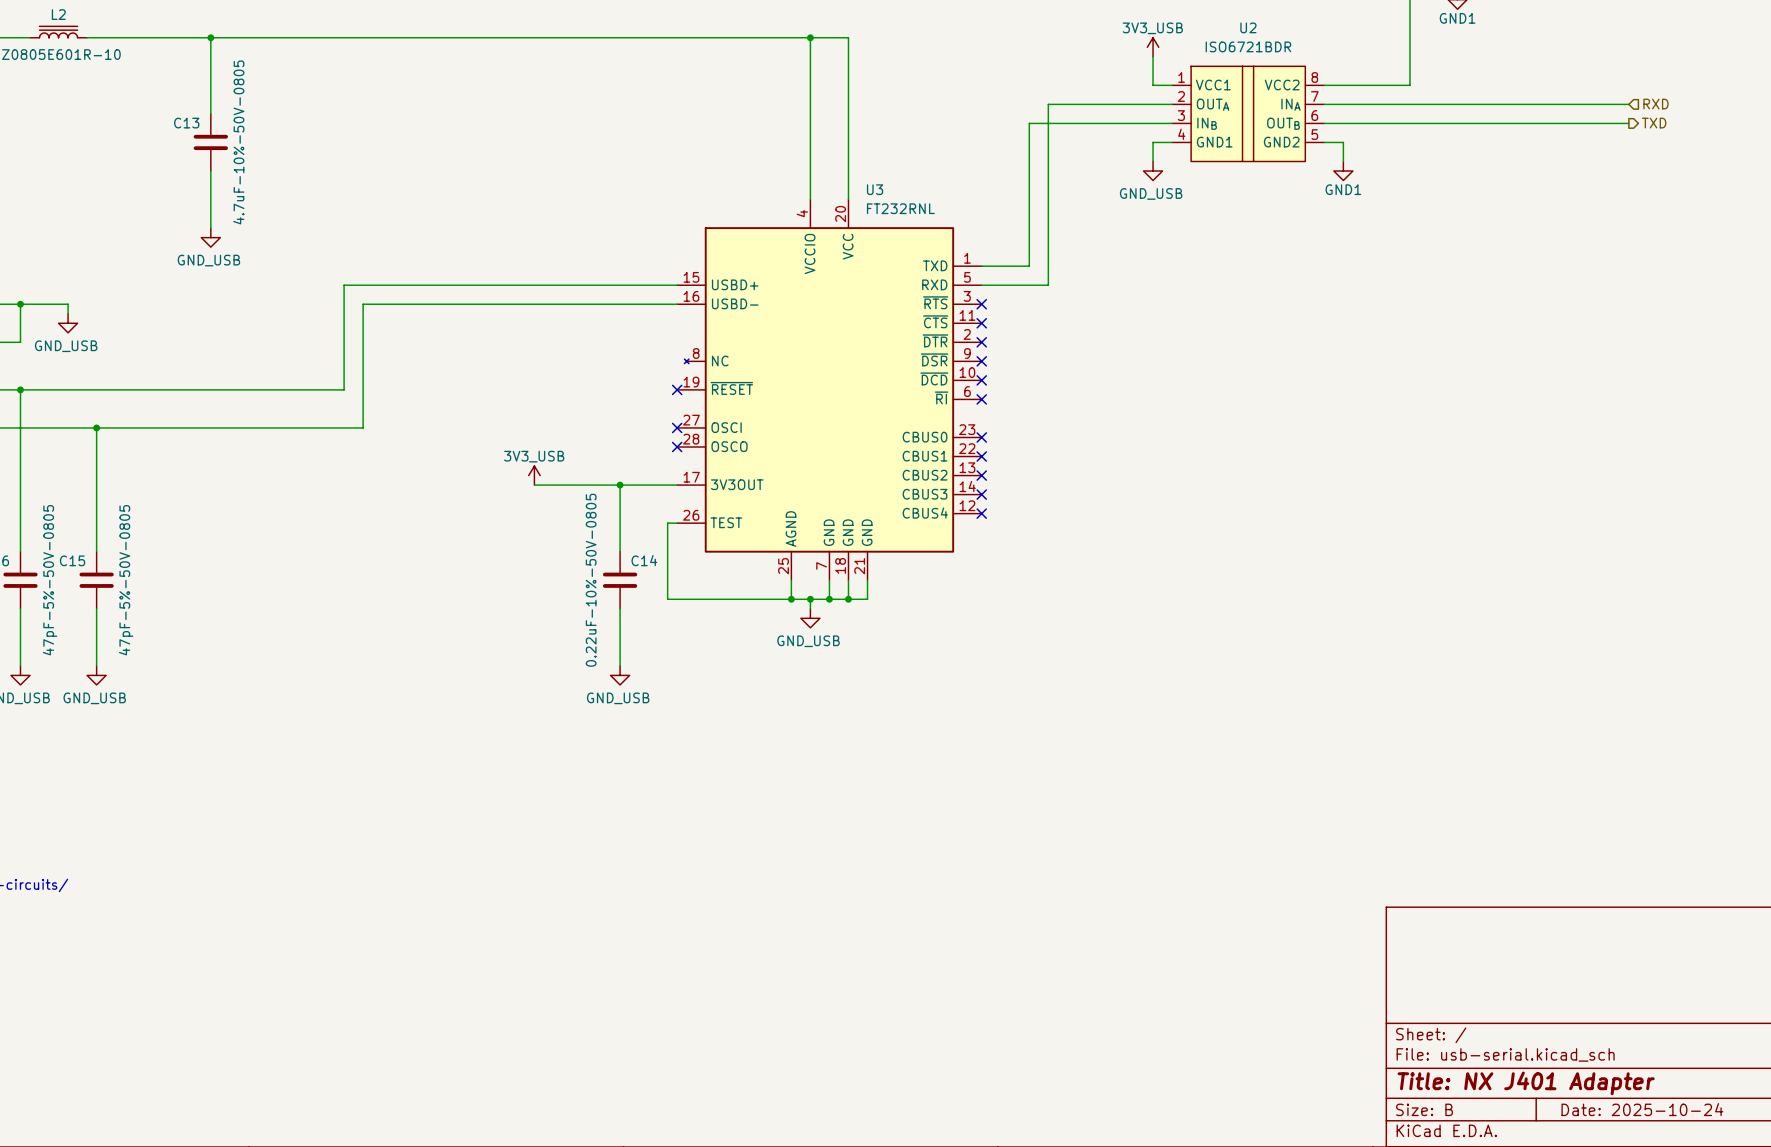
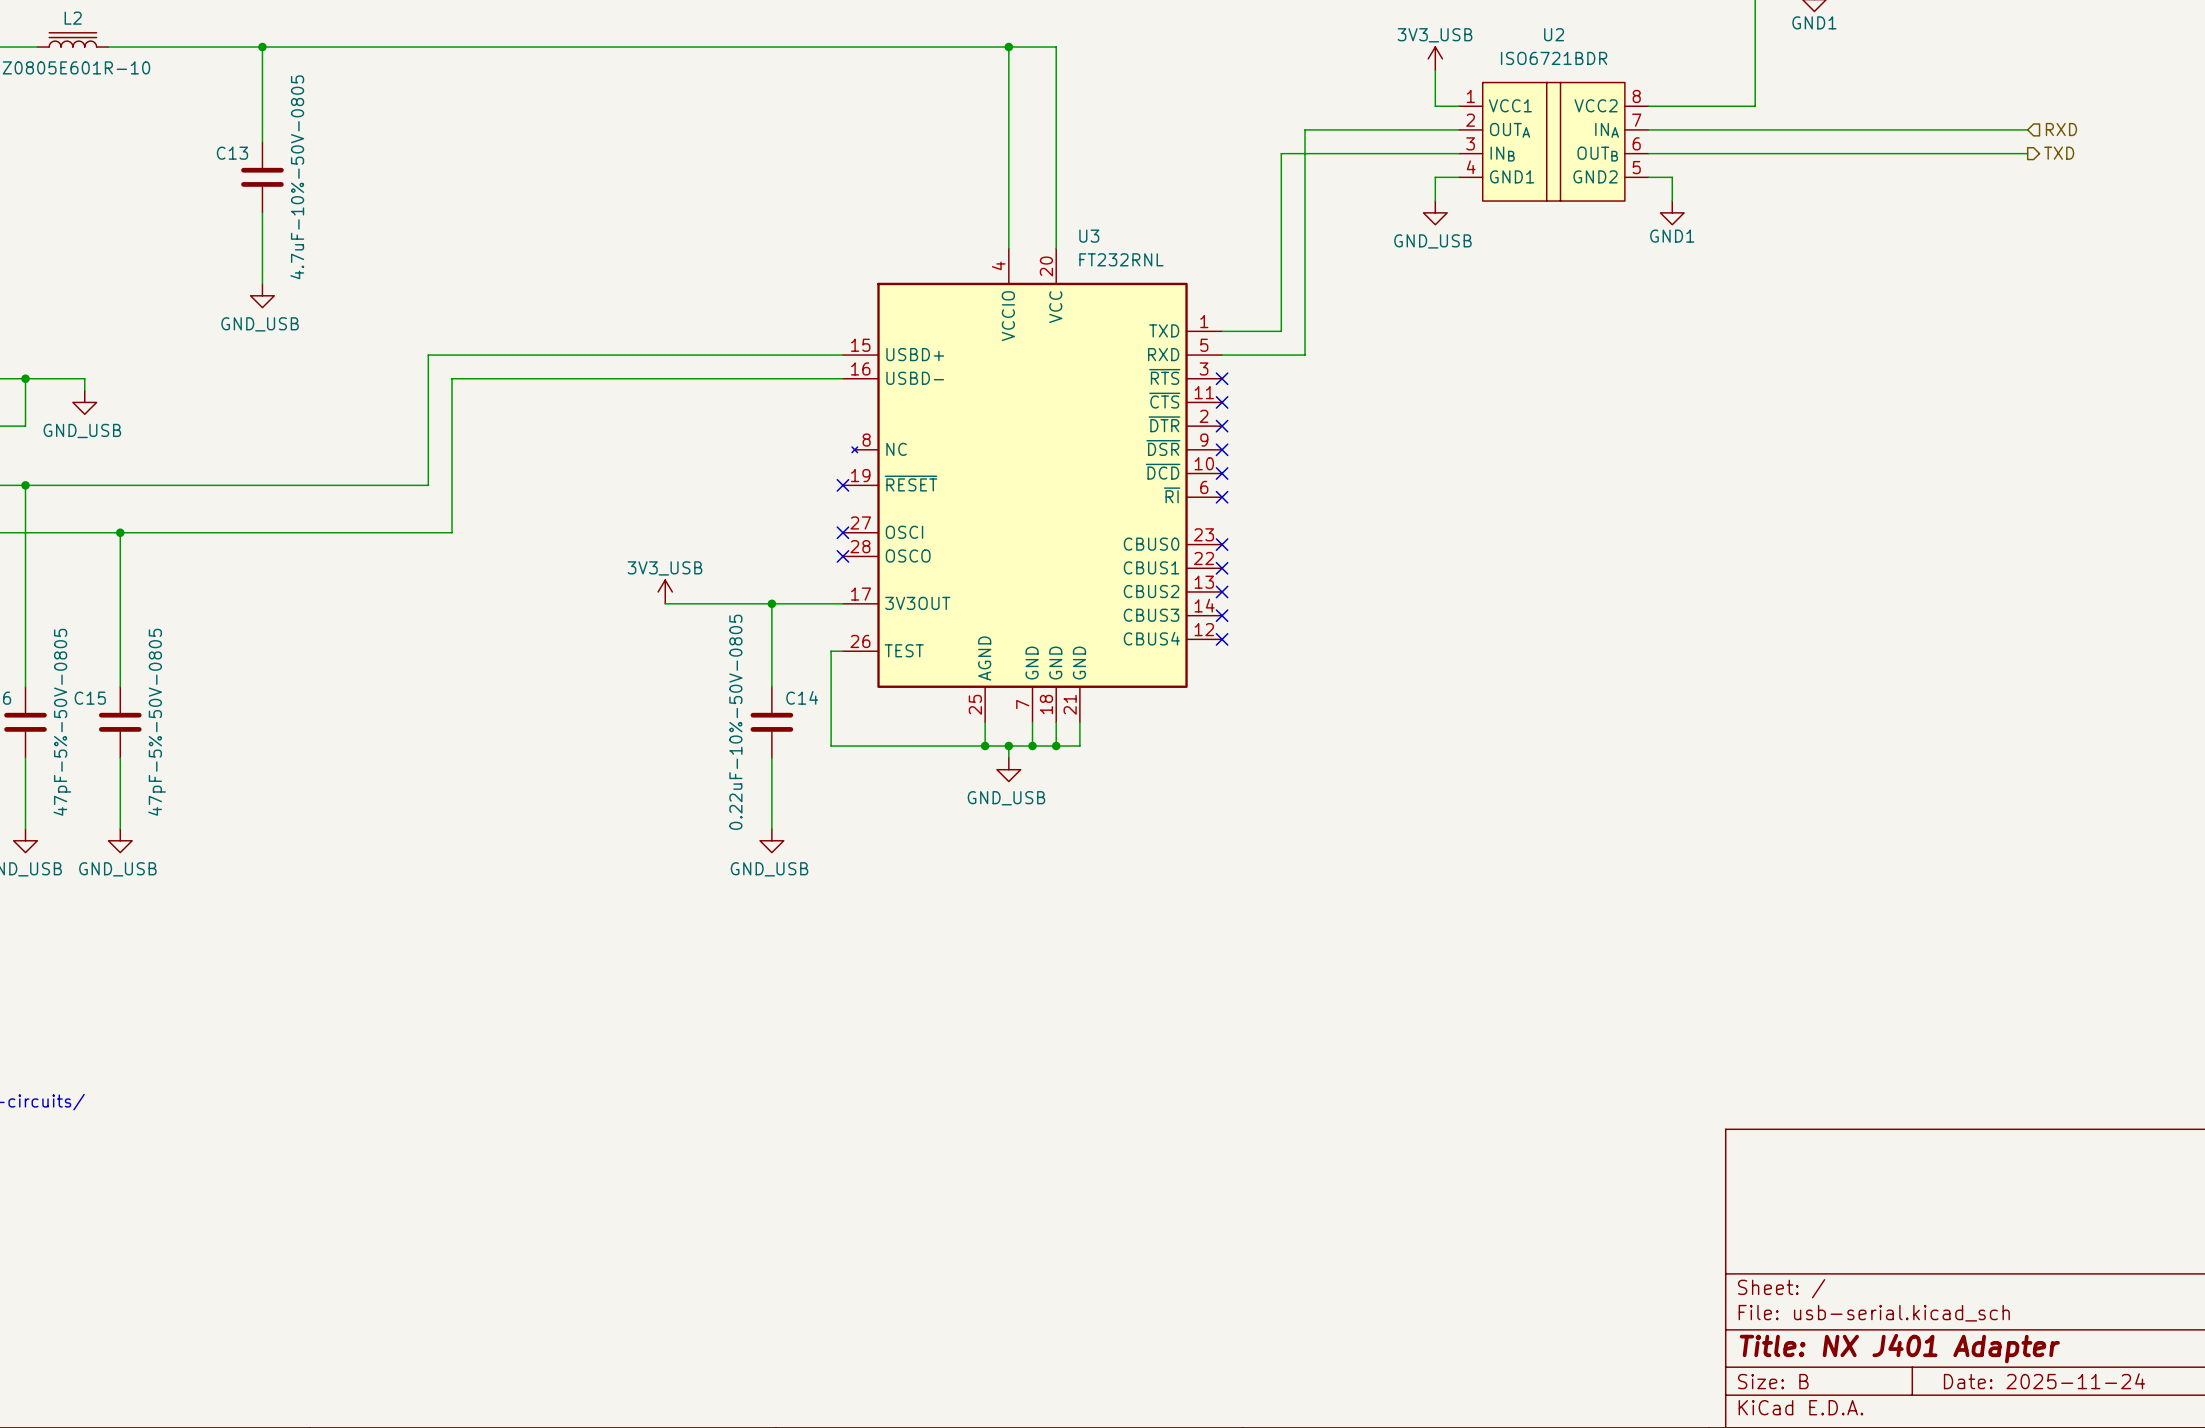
title block: Date: 2025-10-24 (1642, 1109) -> Date: 2025-11-24 (2044, 1381)

